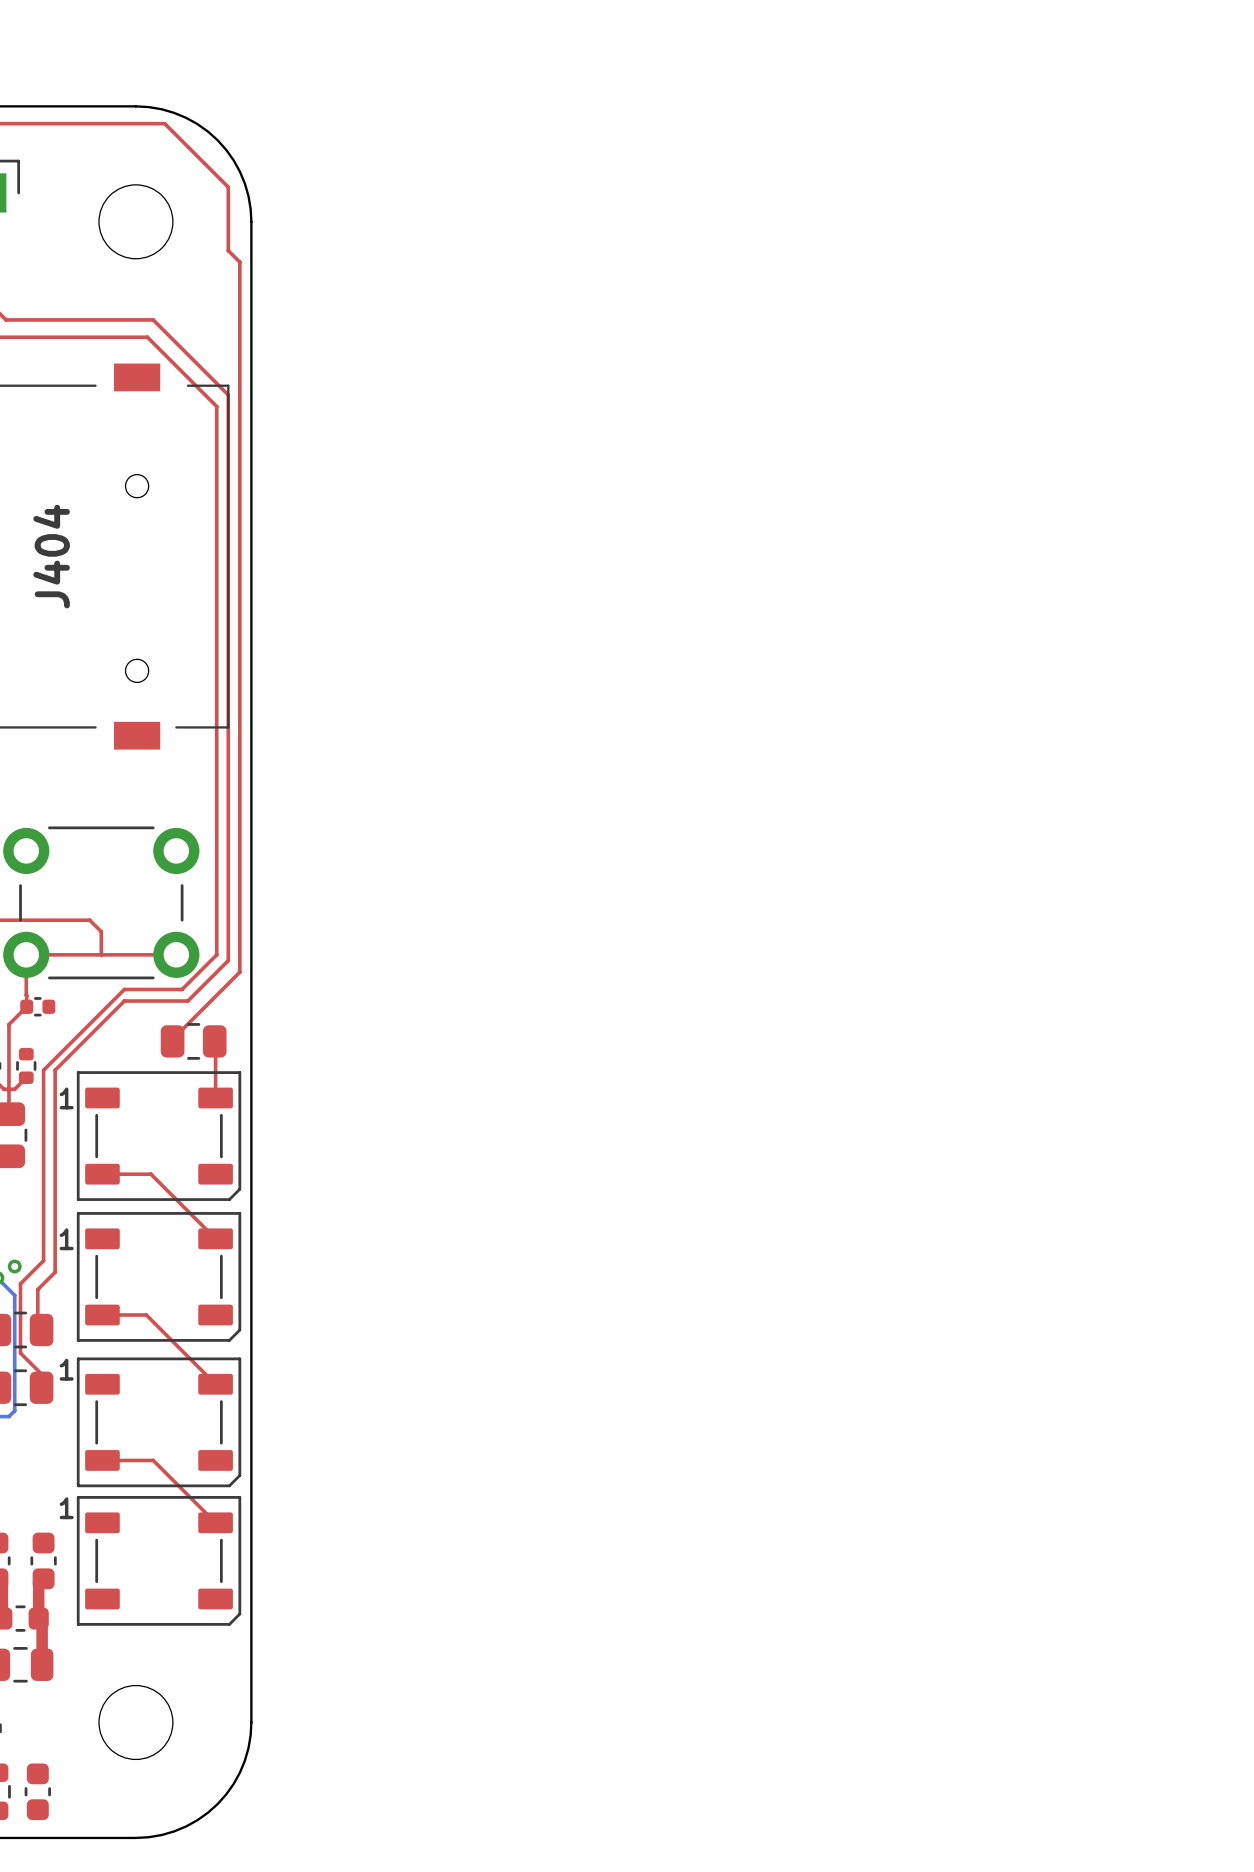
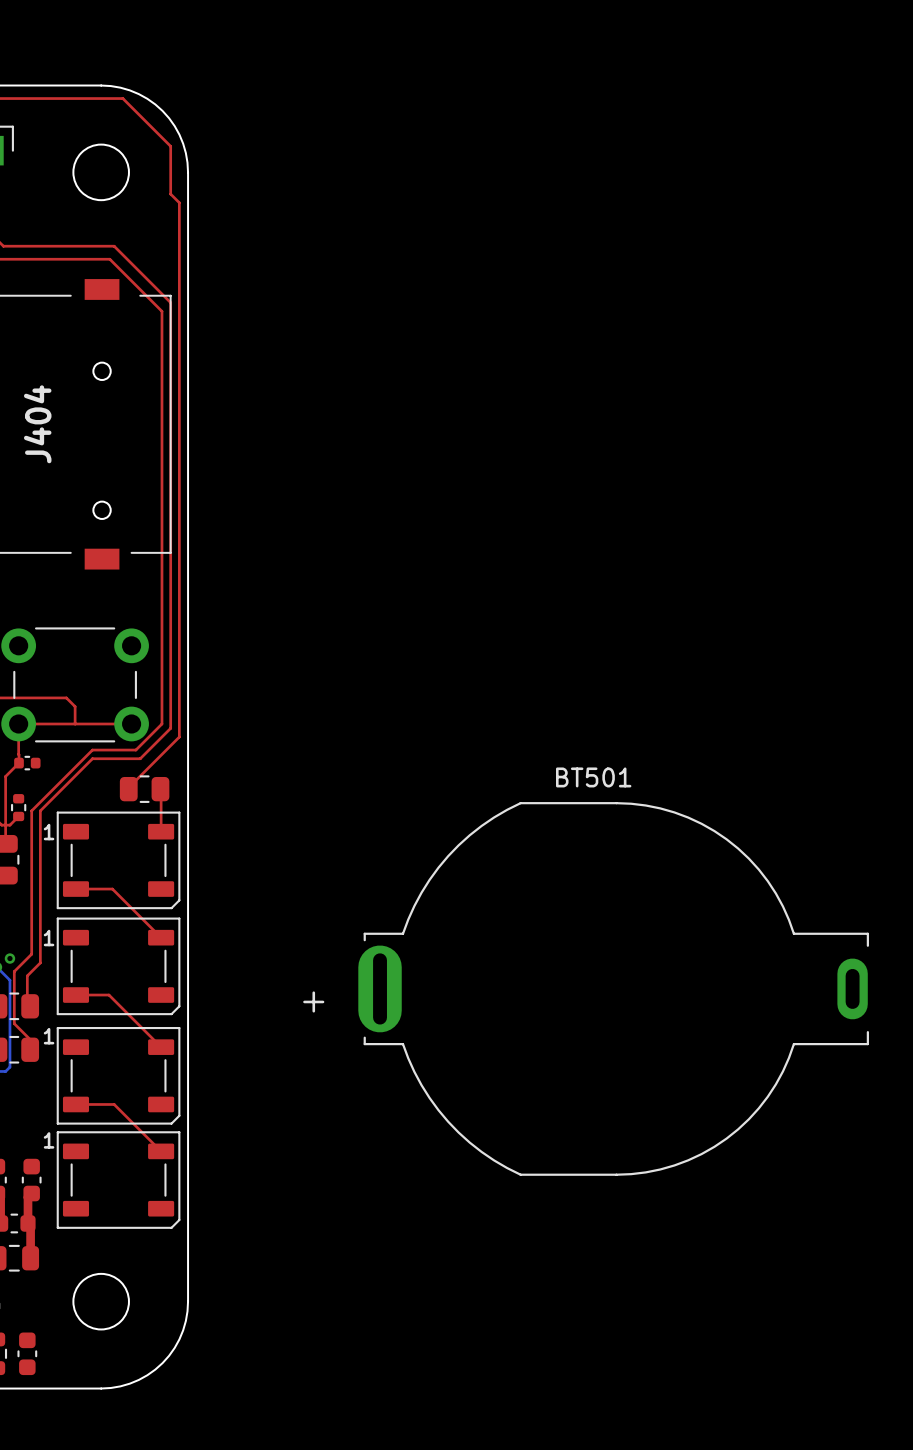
BT501: none -> (613, 988)

